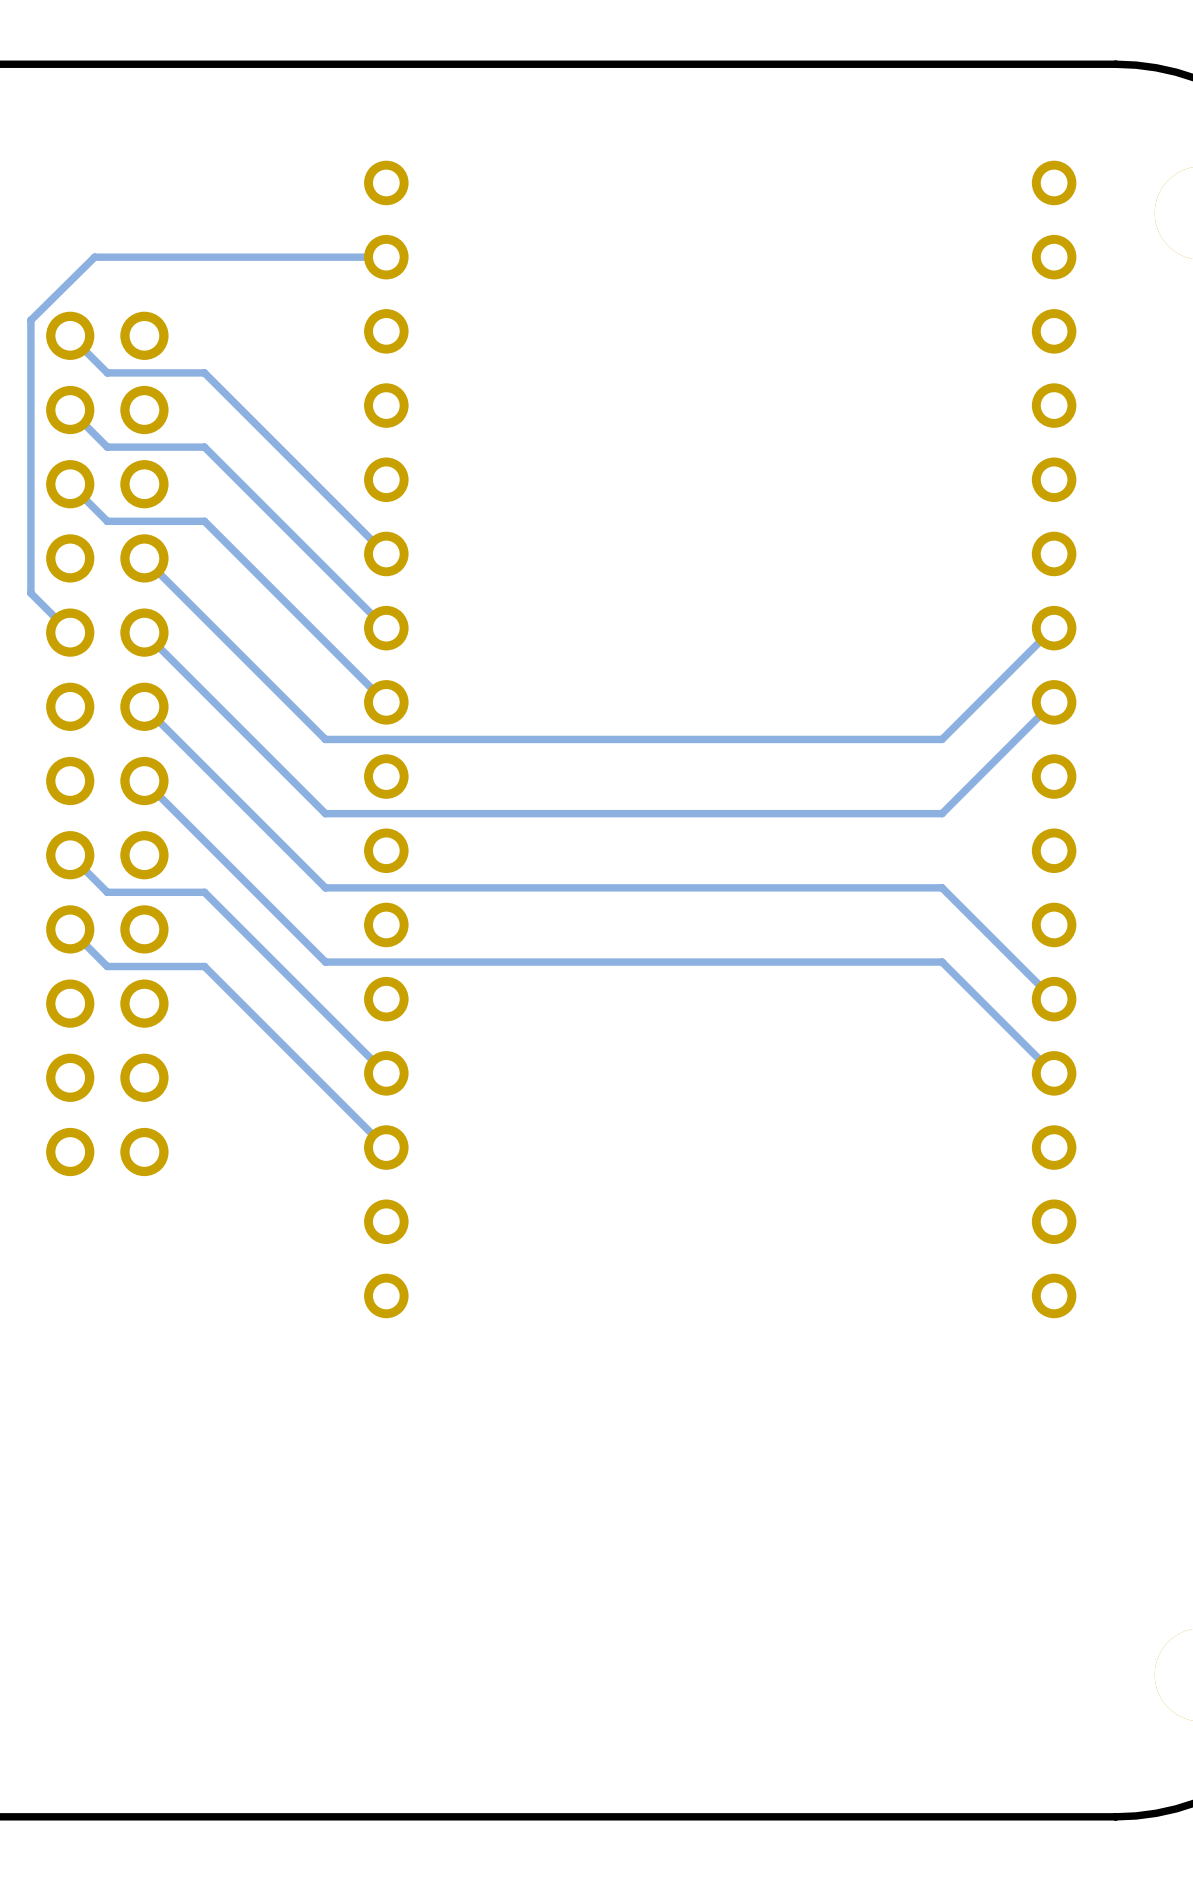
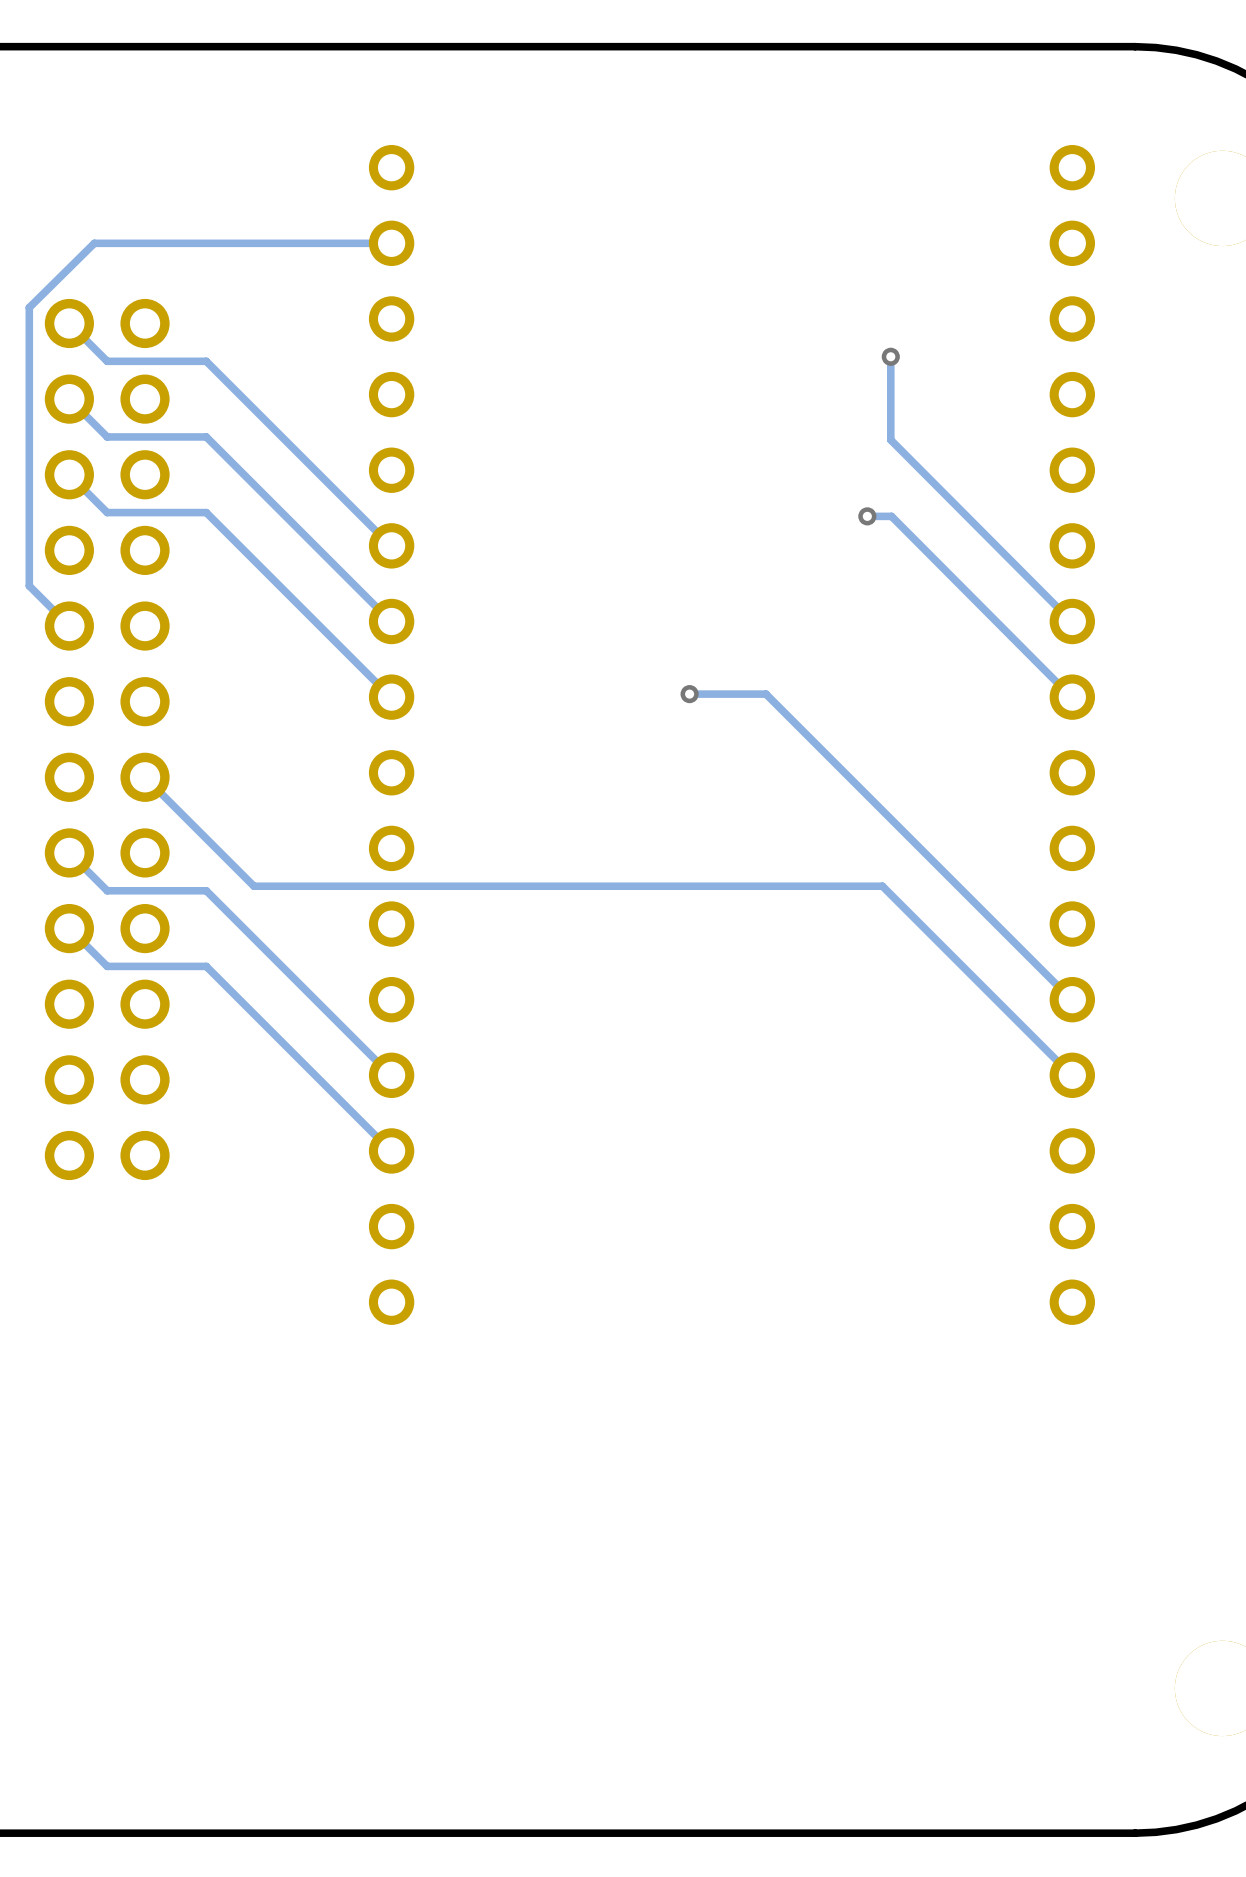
via: none -> (890, 356)
via: none -> (867, 516)
track: (144, 558) (325, 739) (942, 739) (1053, 628) -> (890, 356) (890, 439) (1071, 621)
track: (144, 632) (325, 813) (942, 813) (1053, 702) -> (867, 516) (891, 516) (1071, 697)
track: none -> (689, 694) (765, 694) (958, 886)
via: none -> (689, 694)
track: (144, 706) (325, 887) -> (253, 886) (329, 886)
track: (251, 887) (325, 962) (942, 962) -> none
track: (942, 887) (867, 887) -> (958, 961) (882, 886)

